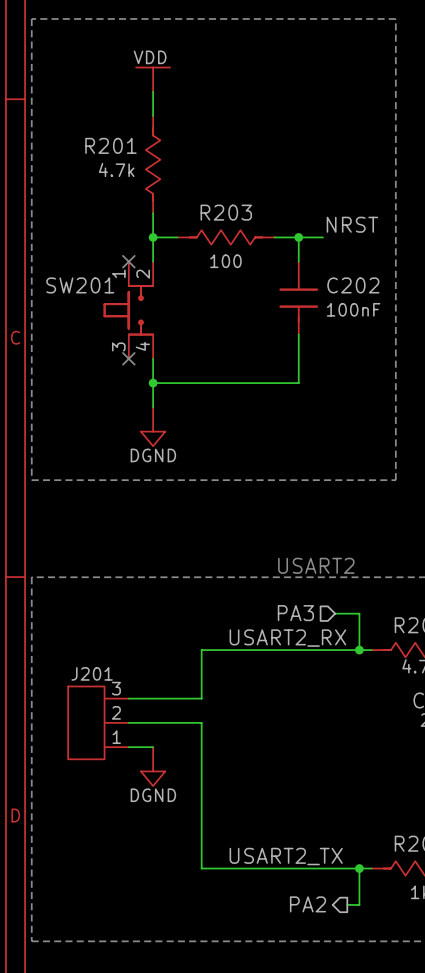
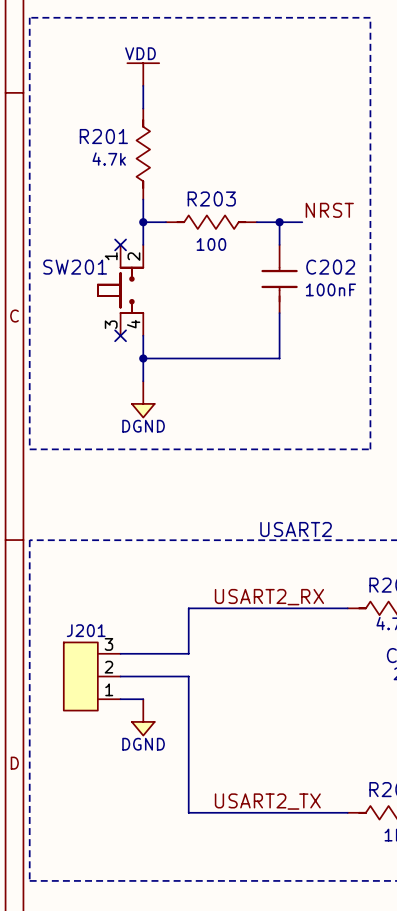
hierarchical label: PA3 (295, 613) -> none
wire: (335, 613) (359, 613) (359, 650) -> none
junction: (359, 650) -> none
wire: (359, 868) (359, 904) (347, 904) -> none
junction: (359, 868) -> none
hierarchical label: PA2 (308, 904) -> none

